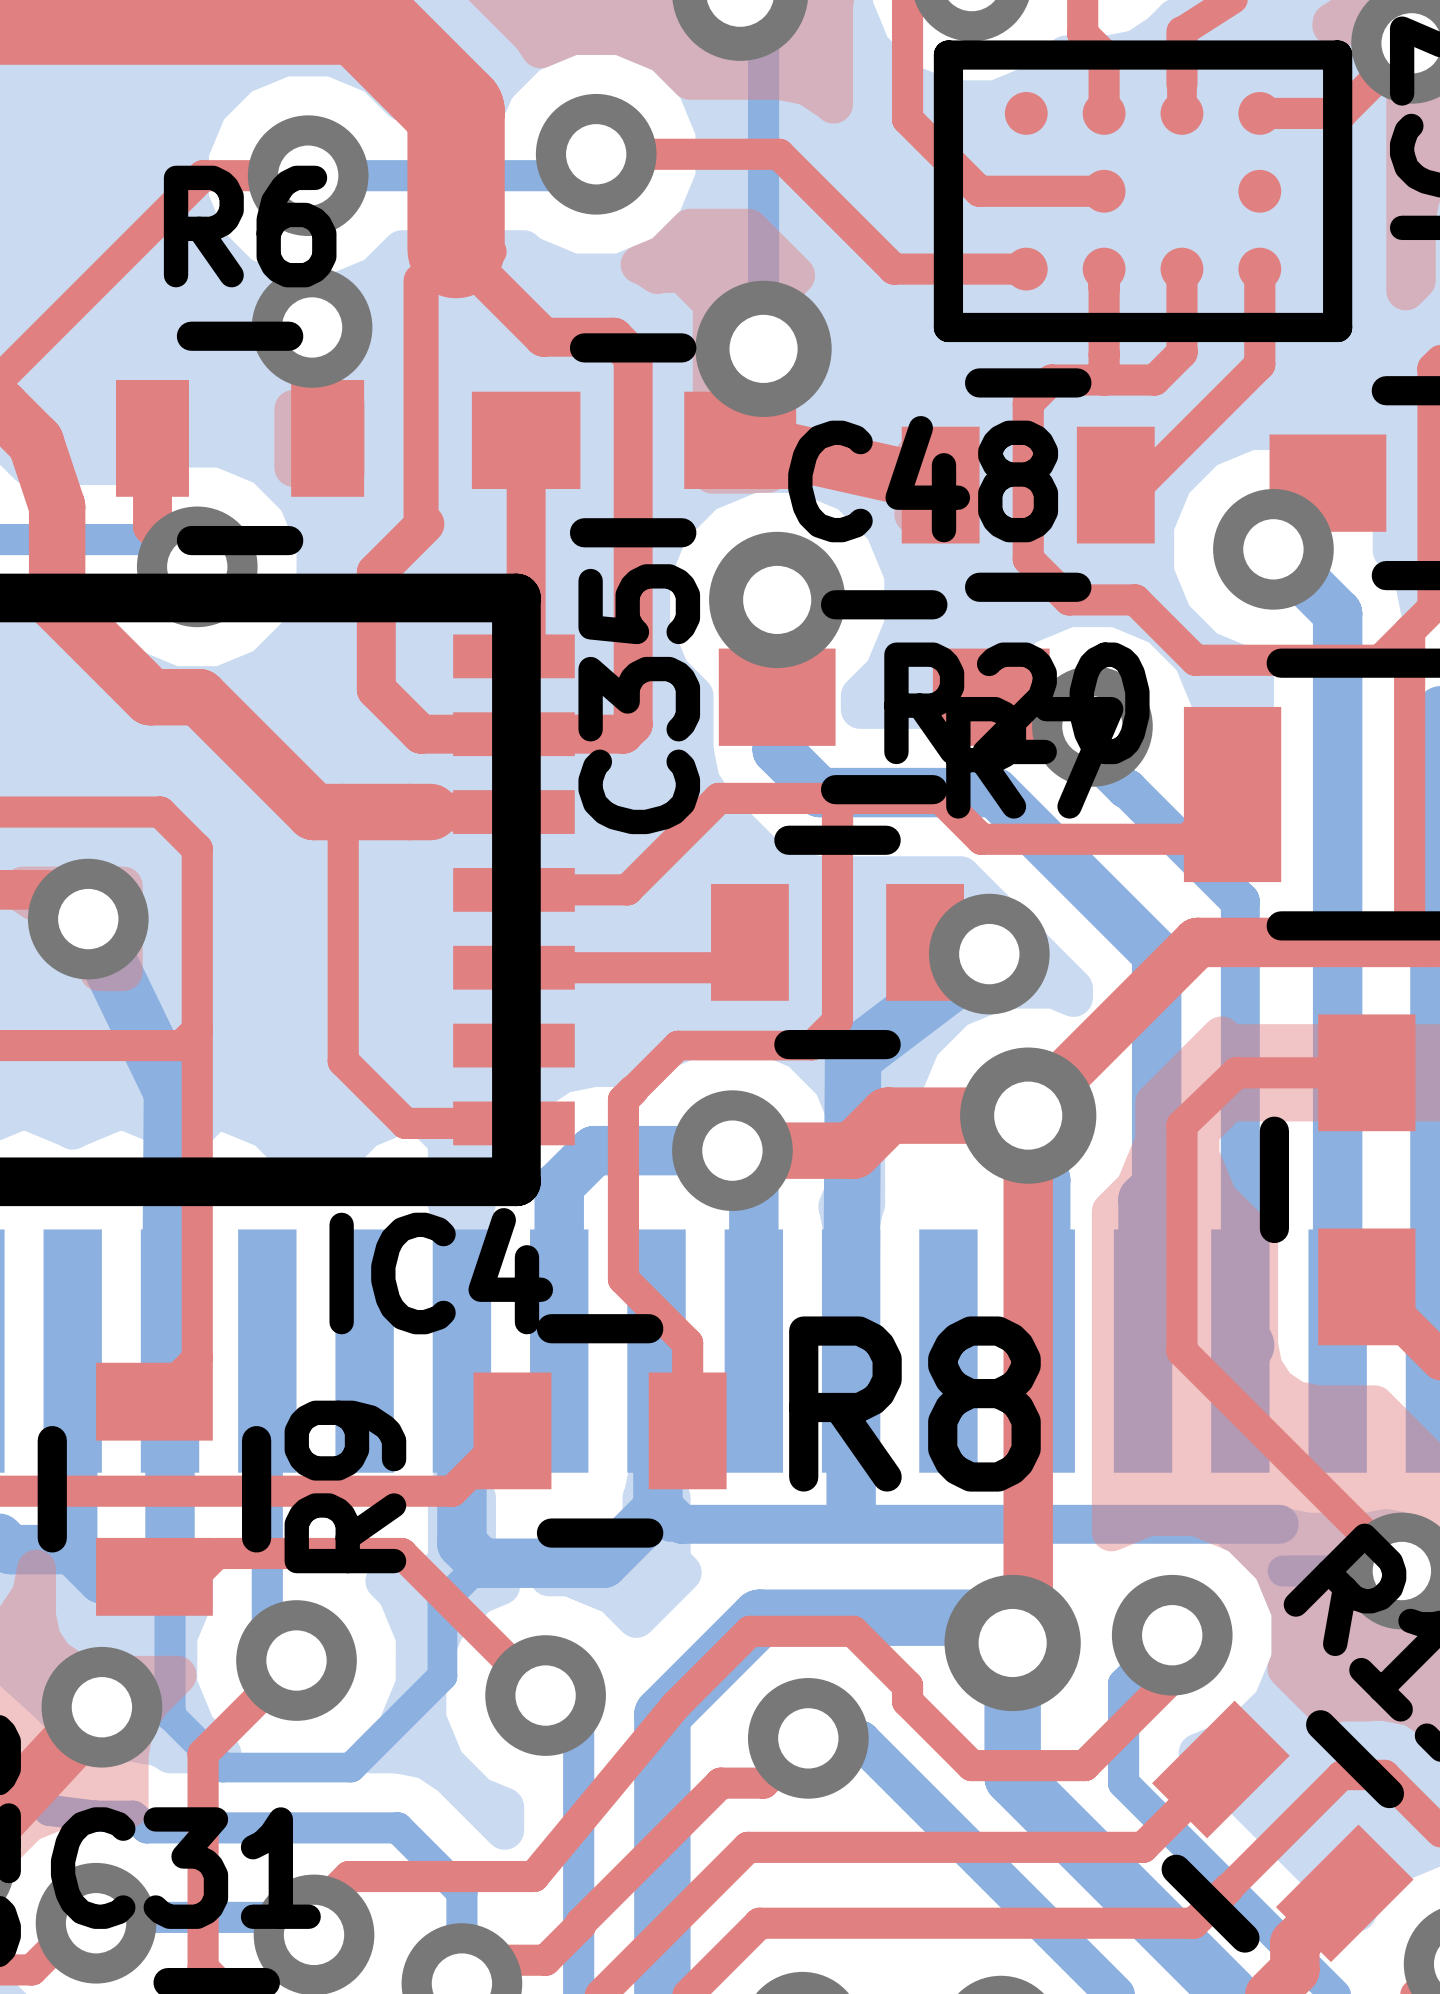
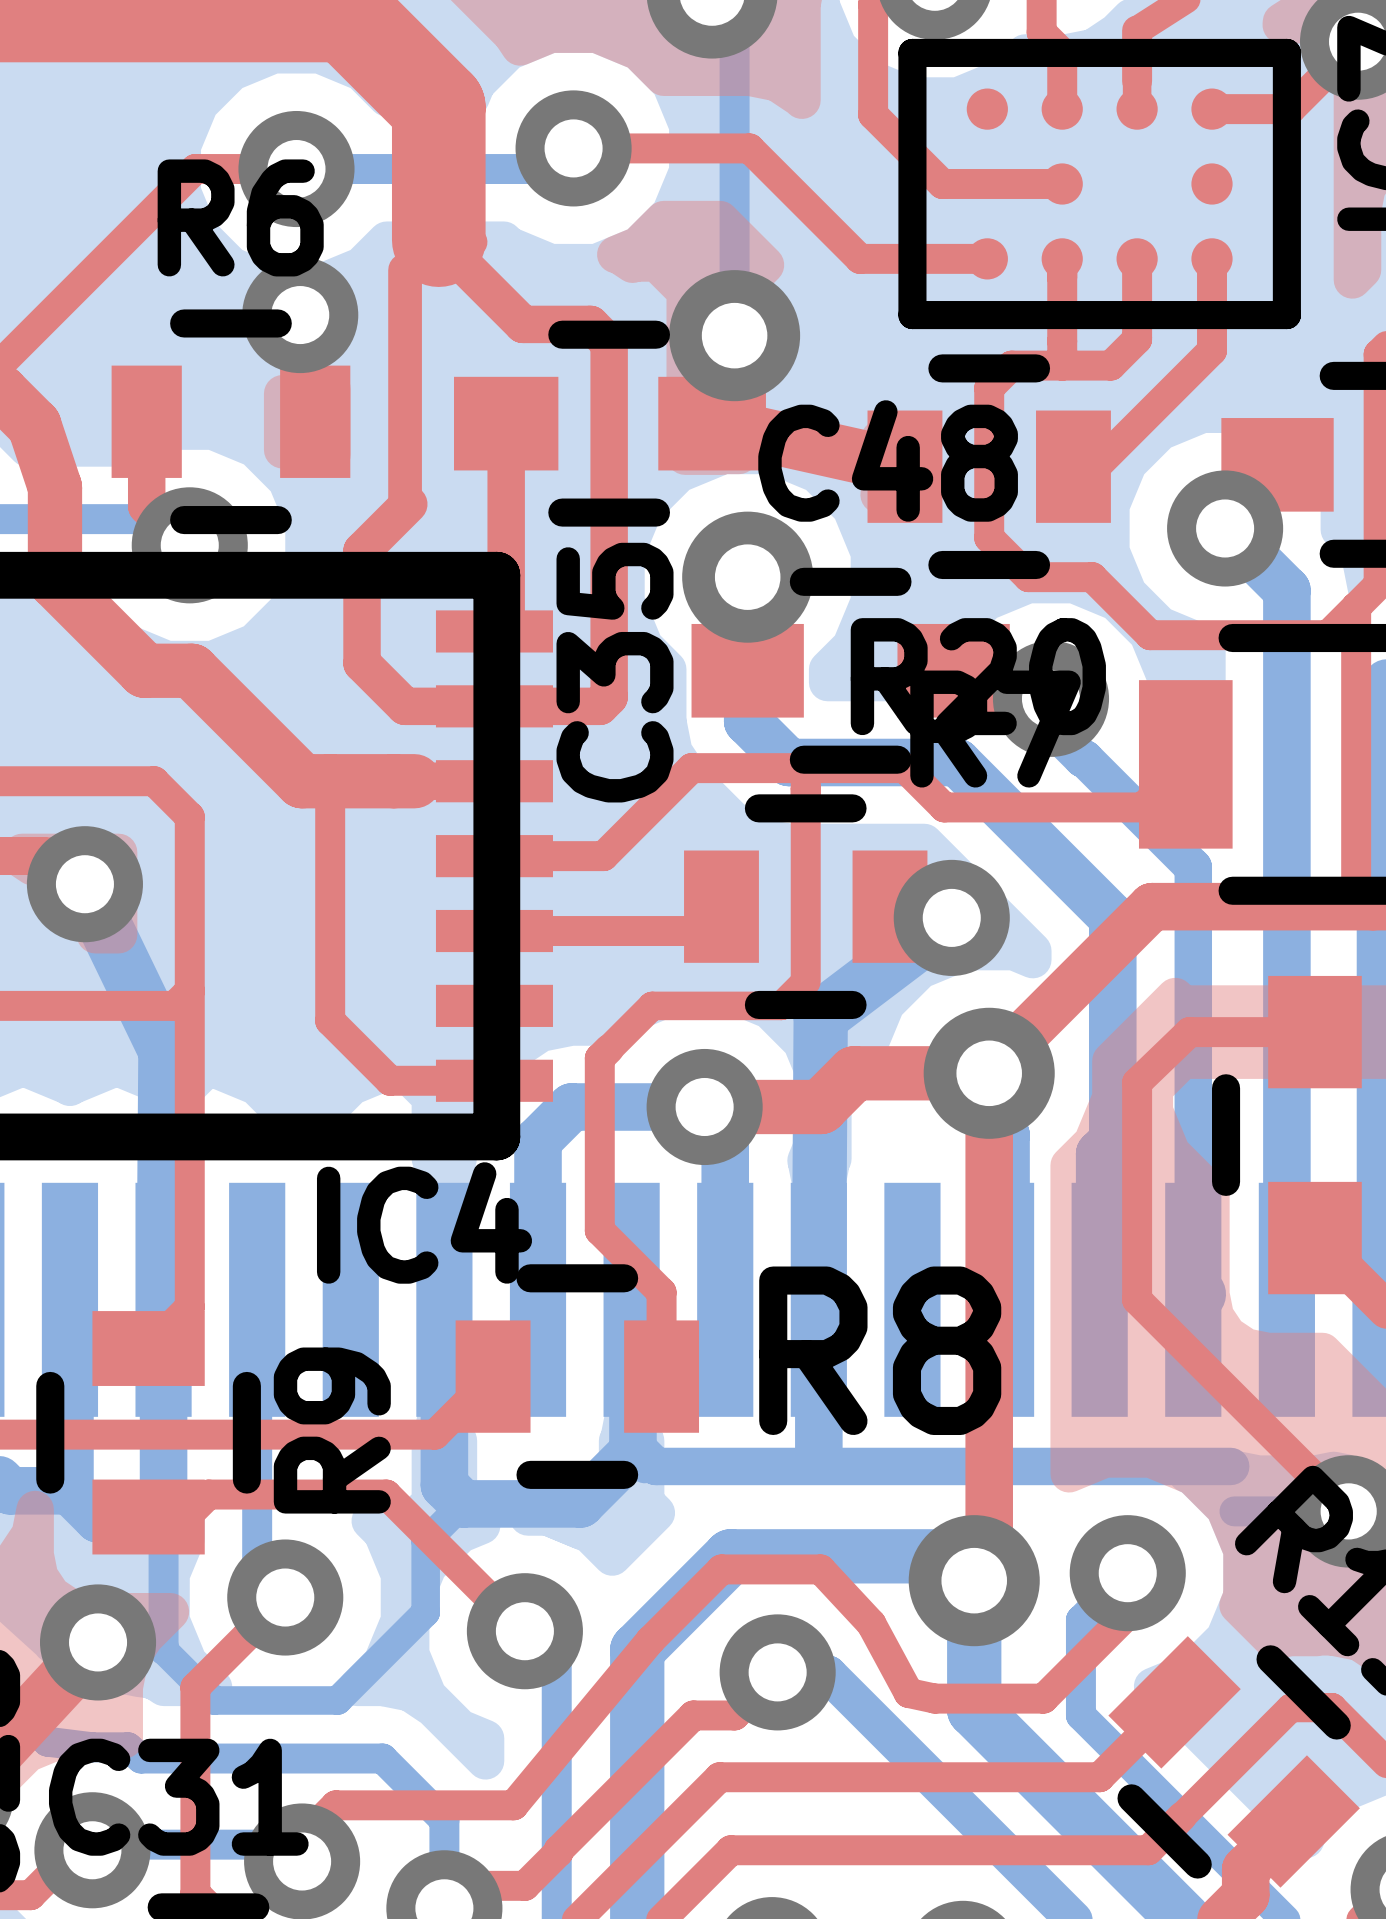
top track: (853, 1631) (907, 1685) (907, 1701) (971, 1765) -> (820, 1569) (871, 1623) (908, 1693) (934, 1698)

